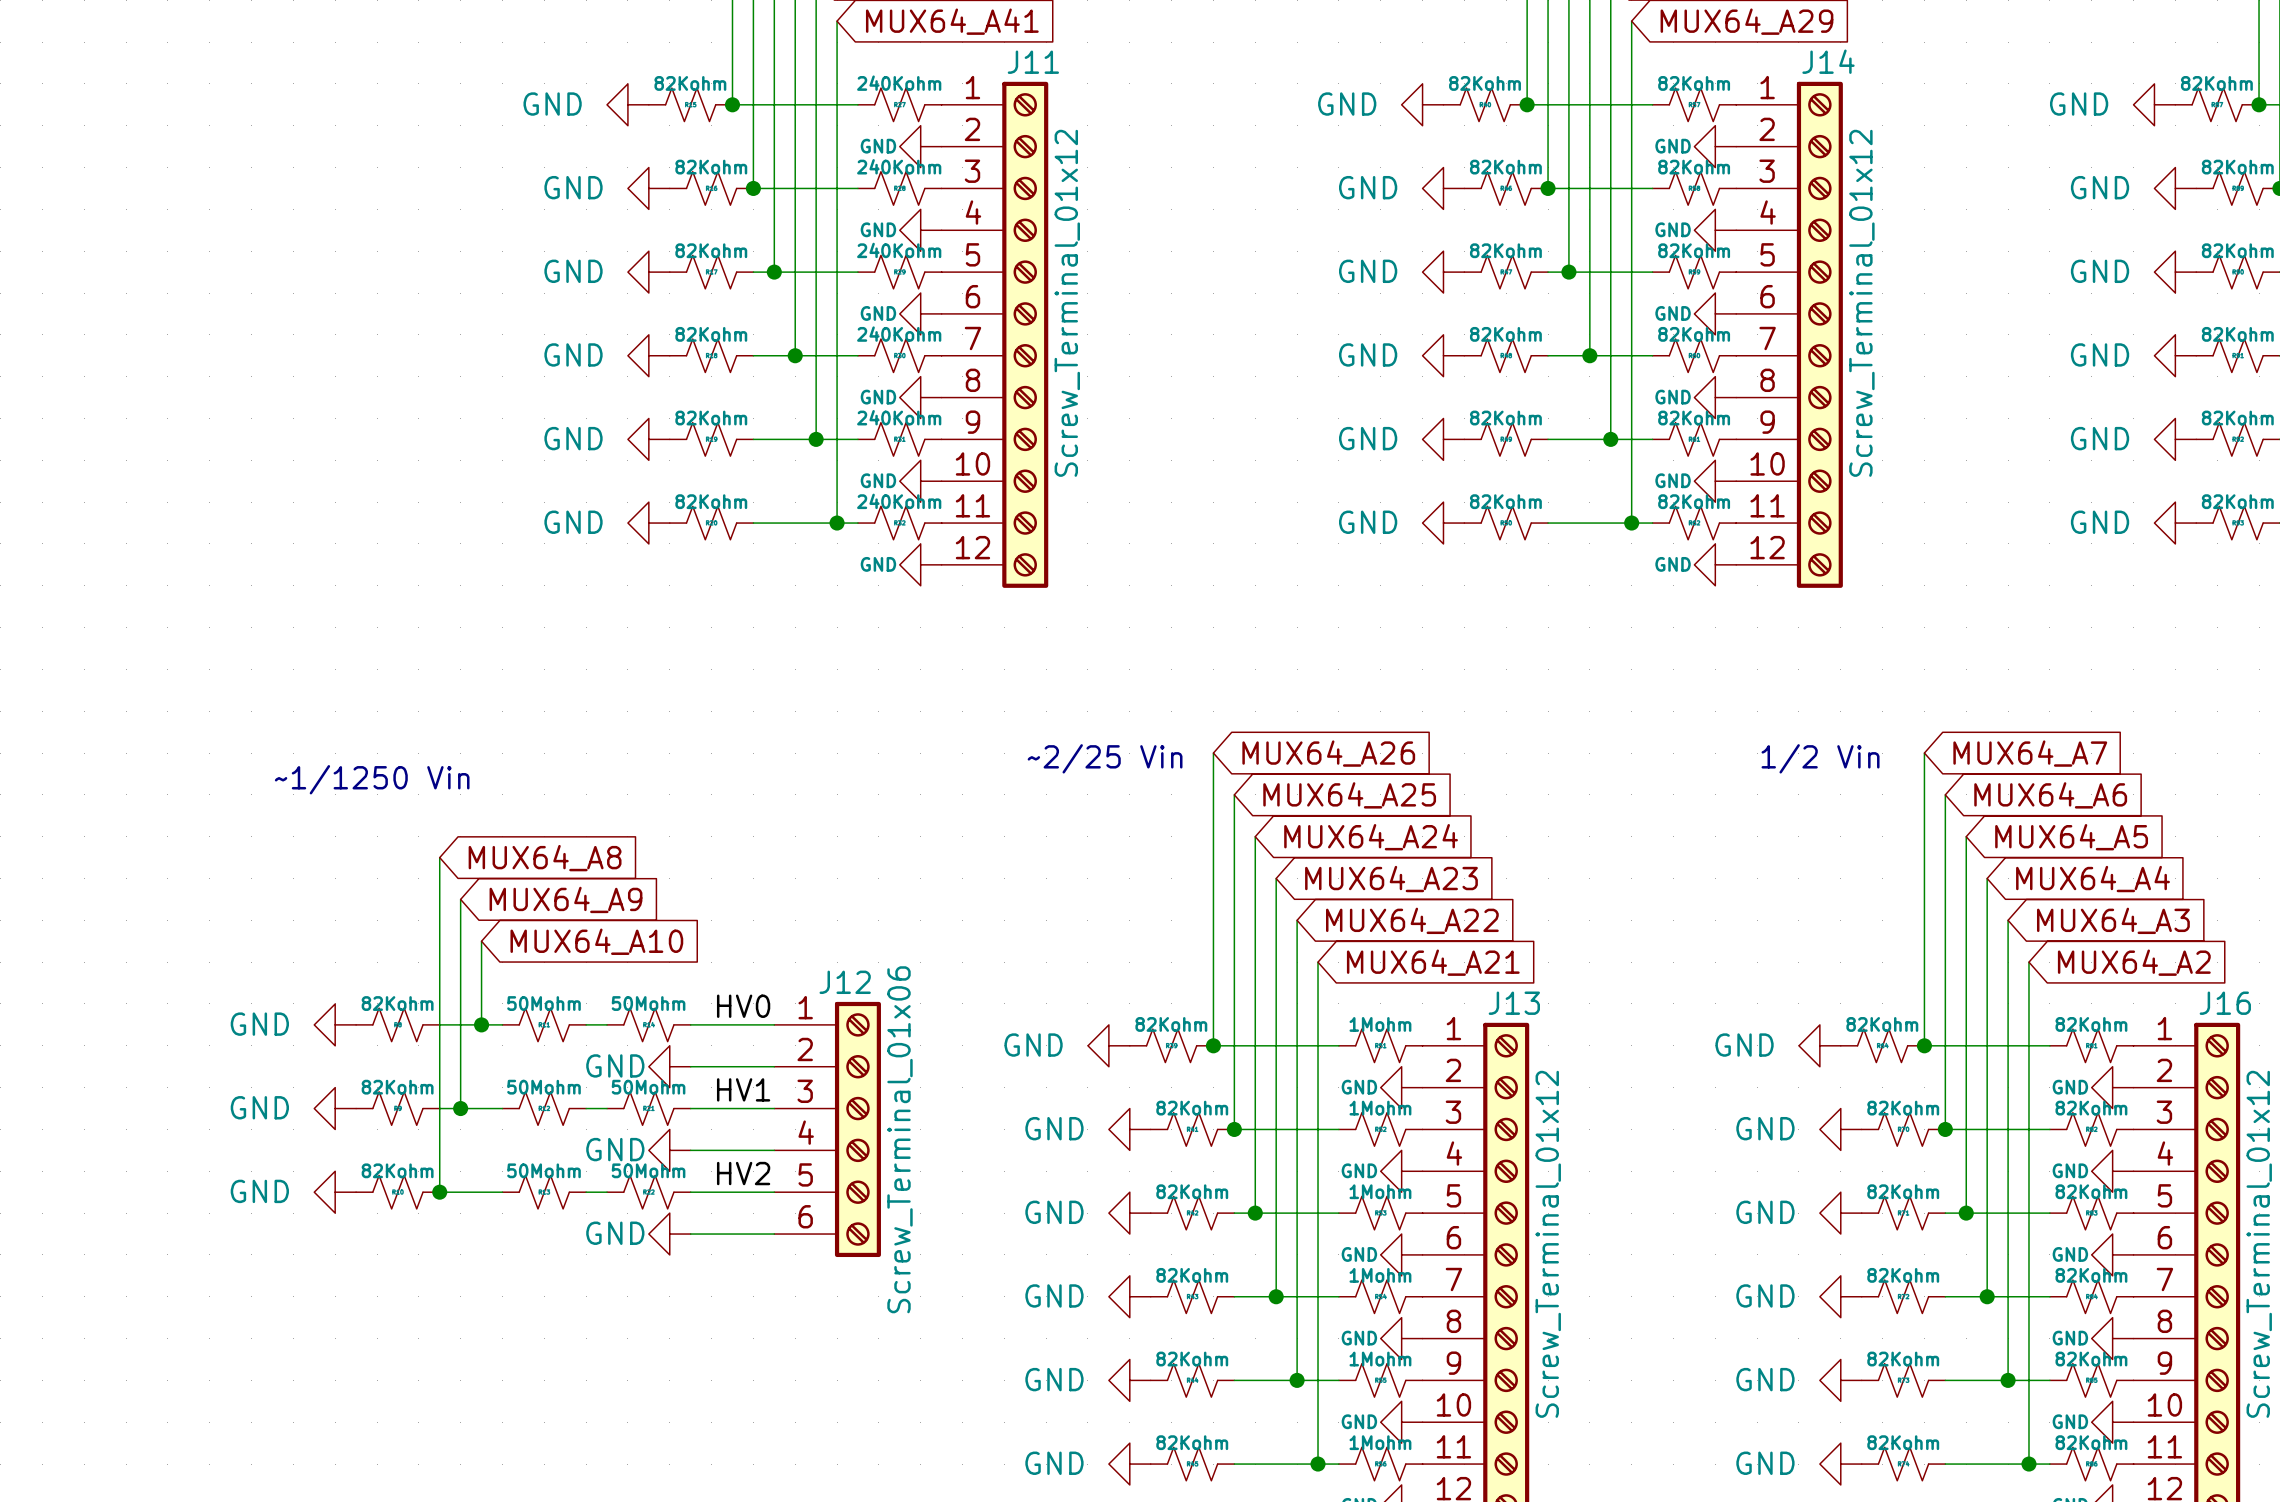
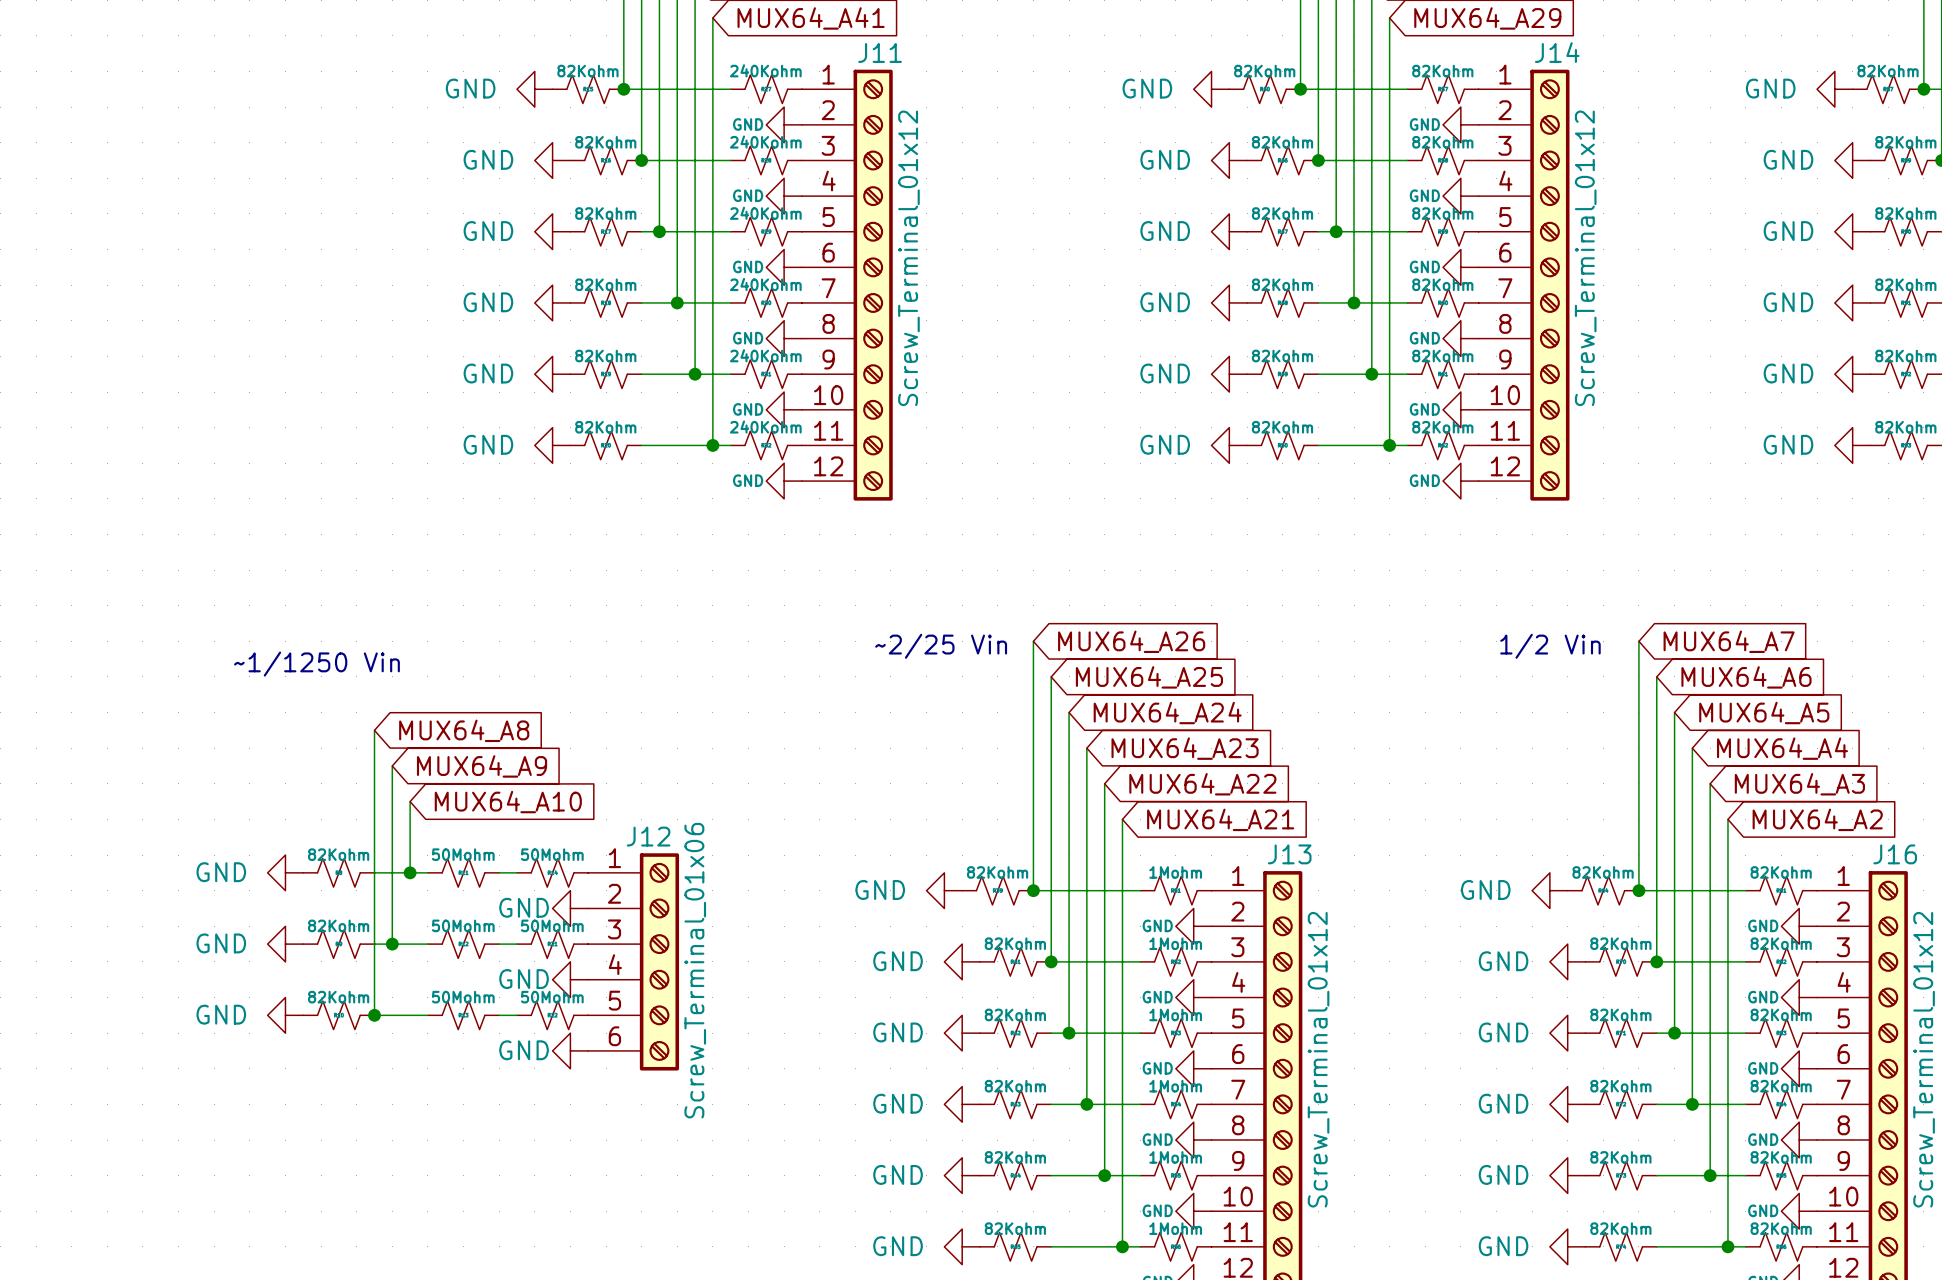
label: HV0 (743, 1006) -> none
label: HV1 (743, 1089) -> none
J12 position: (827, 1129) -> (633, 961)
label: HV2 (743, 1173) -> none

